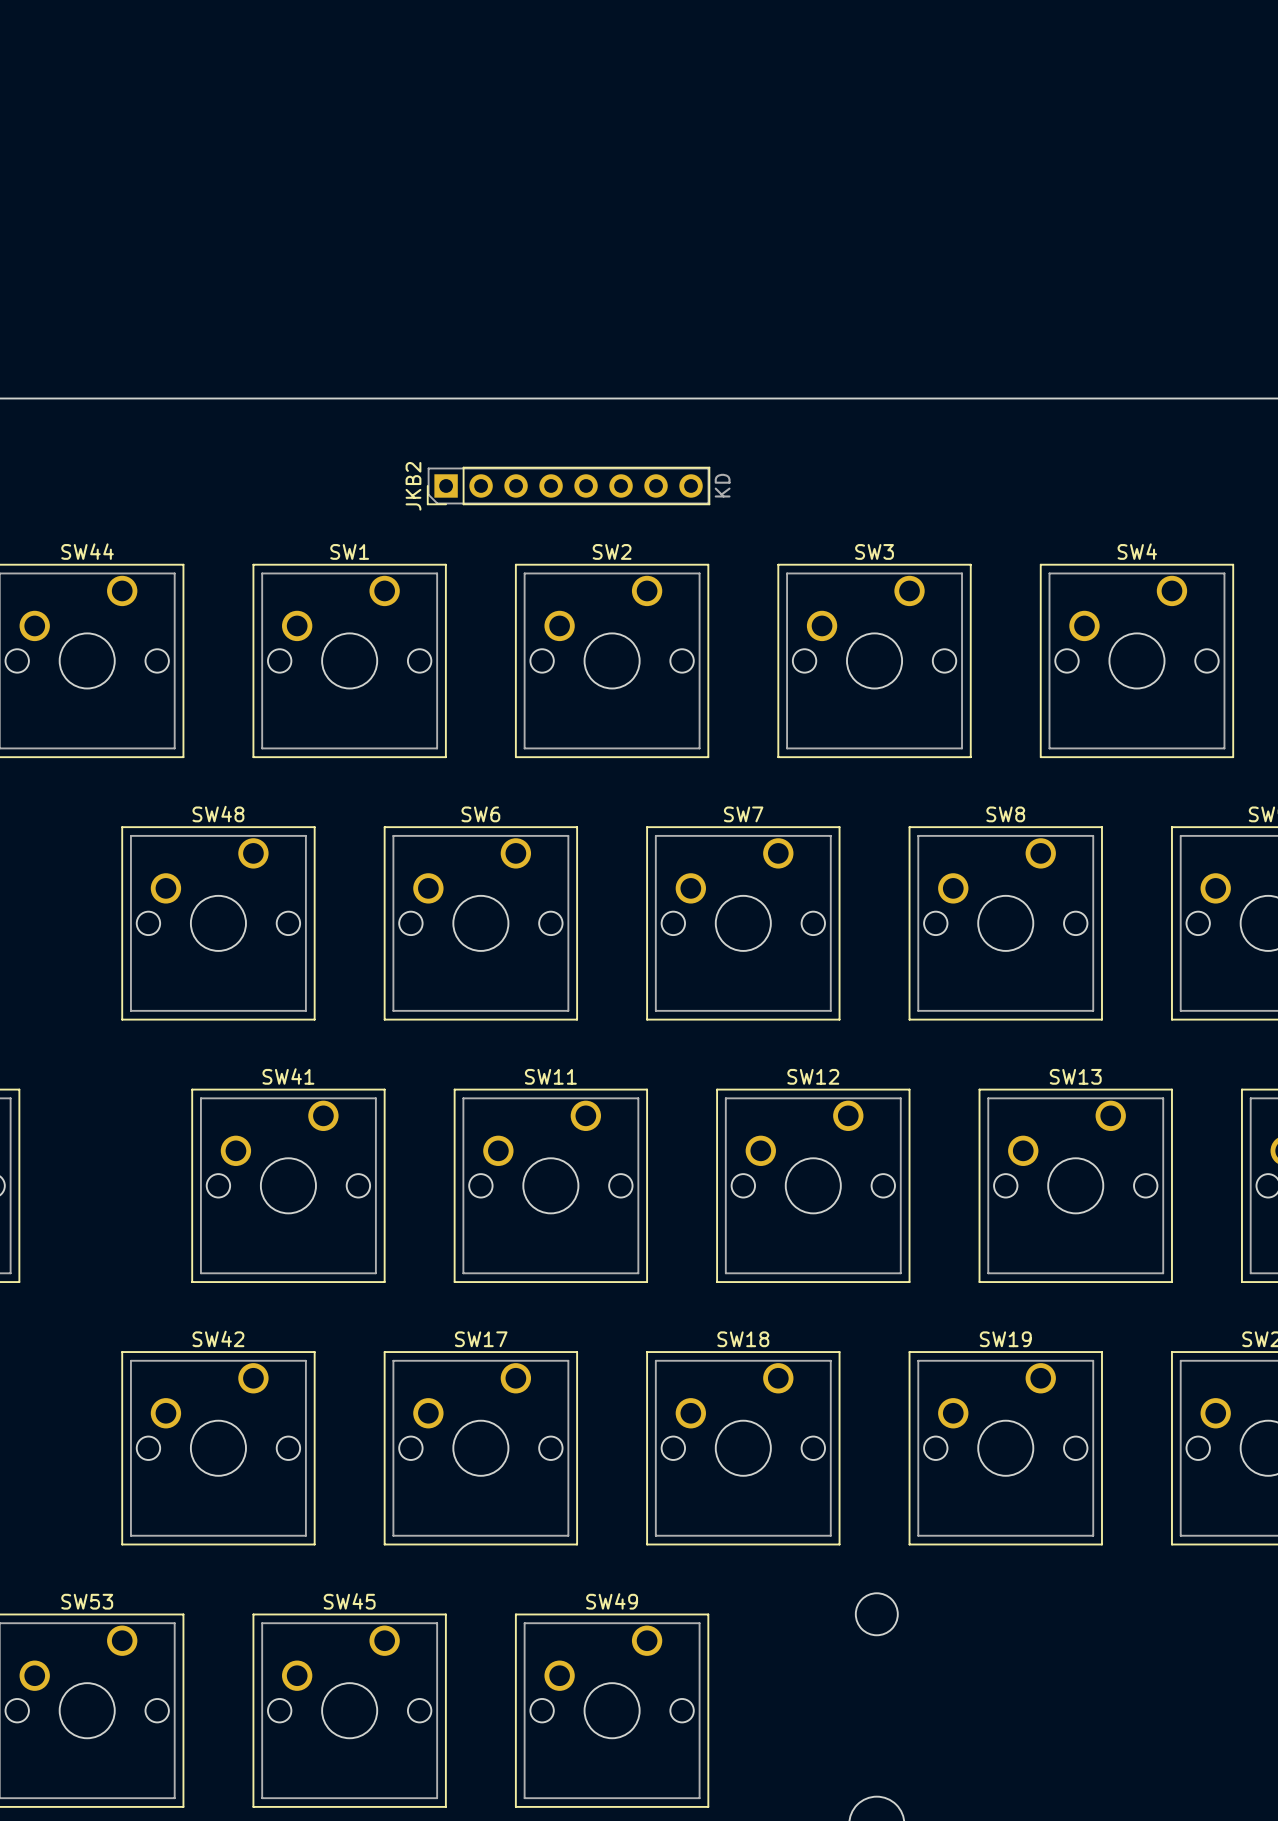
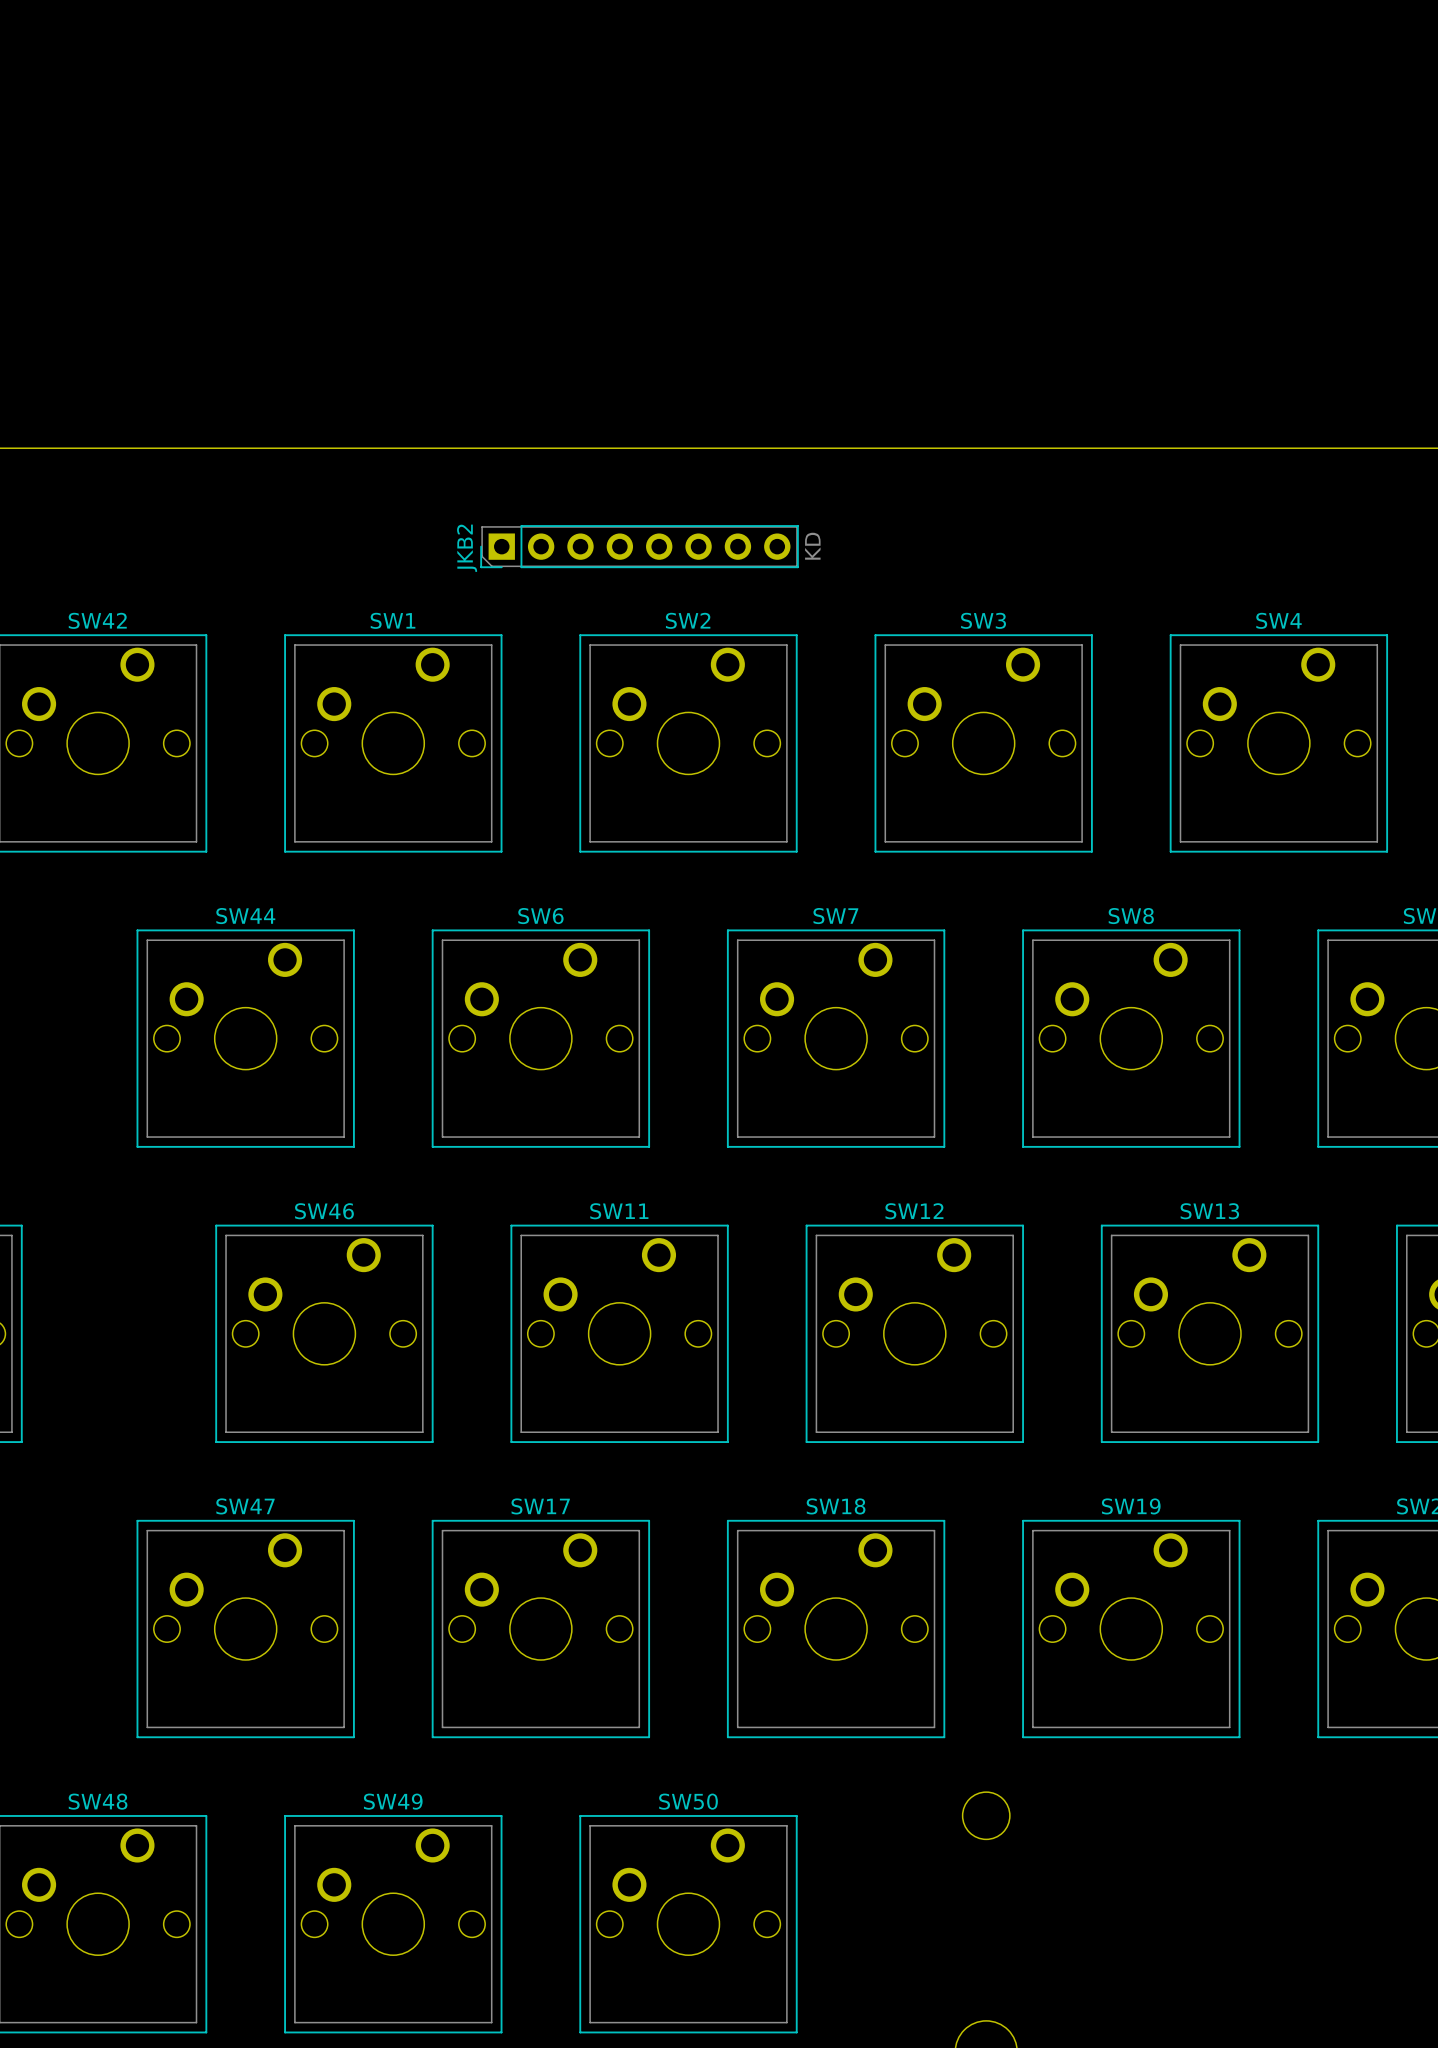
SW44 name: SW44 (87, 551) -> SW42 (97, 620)
SW48 name: SW48 (218, 814) -> SW44 (245, 916)
SW41 name: SW41 (288, 1076) -> SW46 (324, 1211)
SW42 name: SW42 (218, 1338) -> SW47 (245, 1506)
SW53 name: SW53 (87, 1601) -> SW48 (98, 1801)
SW45 name: SW45 (349, 1601) -> SW49 (393, 1801)
SW49 name: SW49 (612, 1601) -> SW50 (688, 1801)

